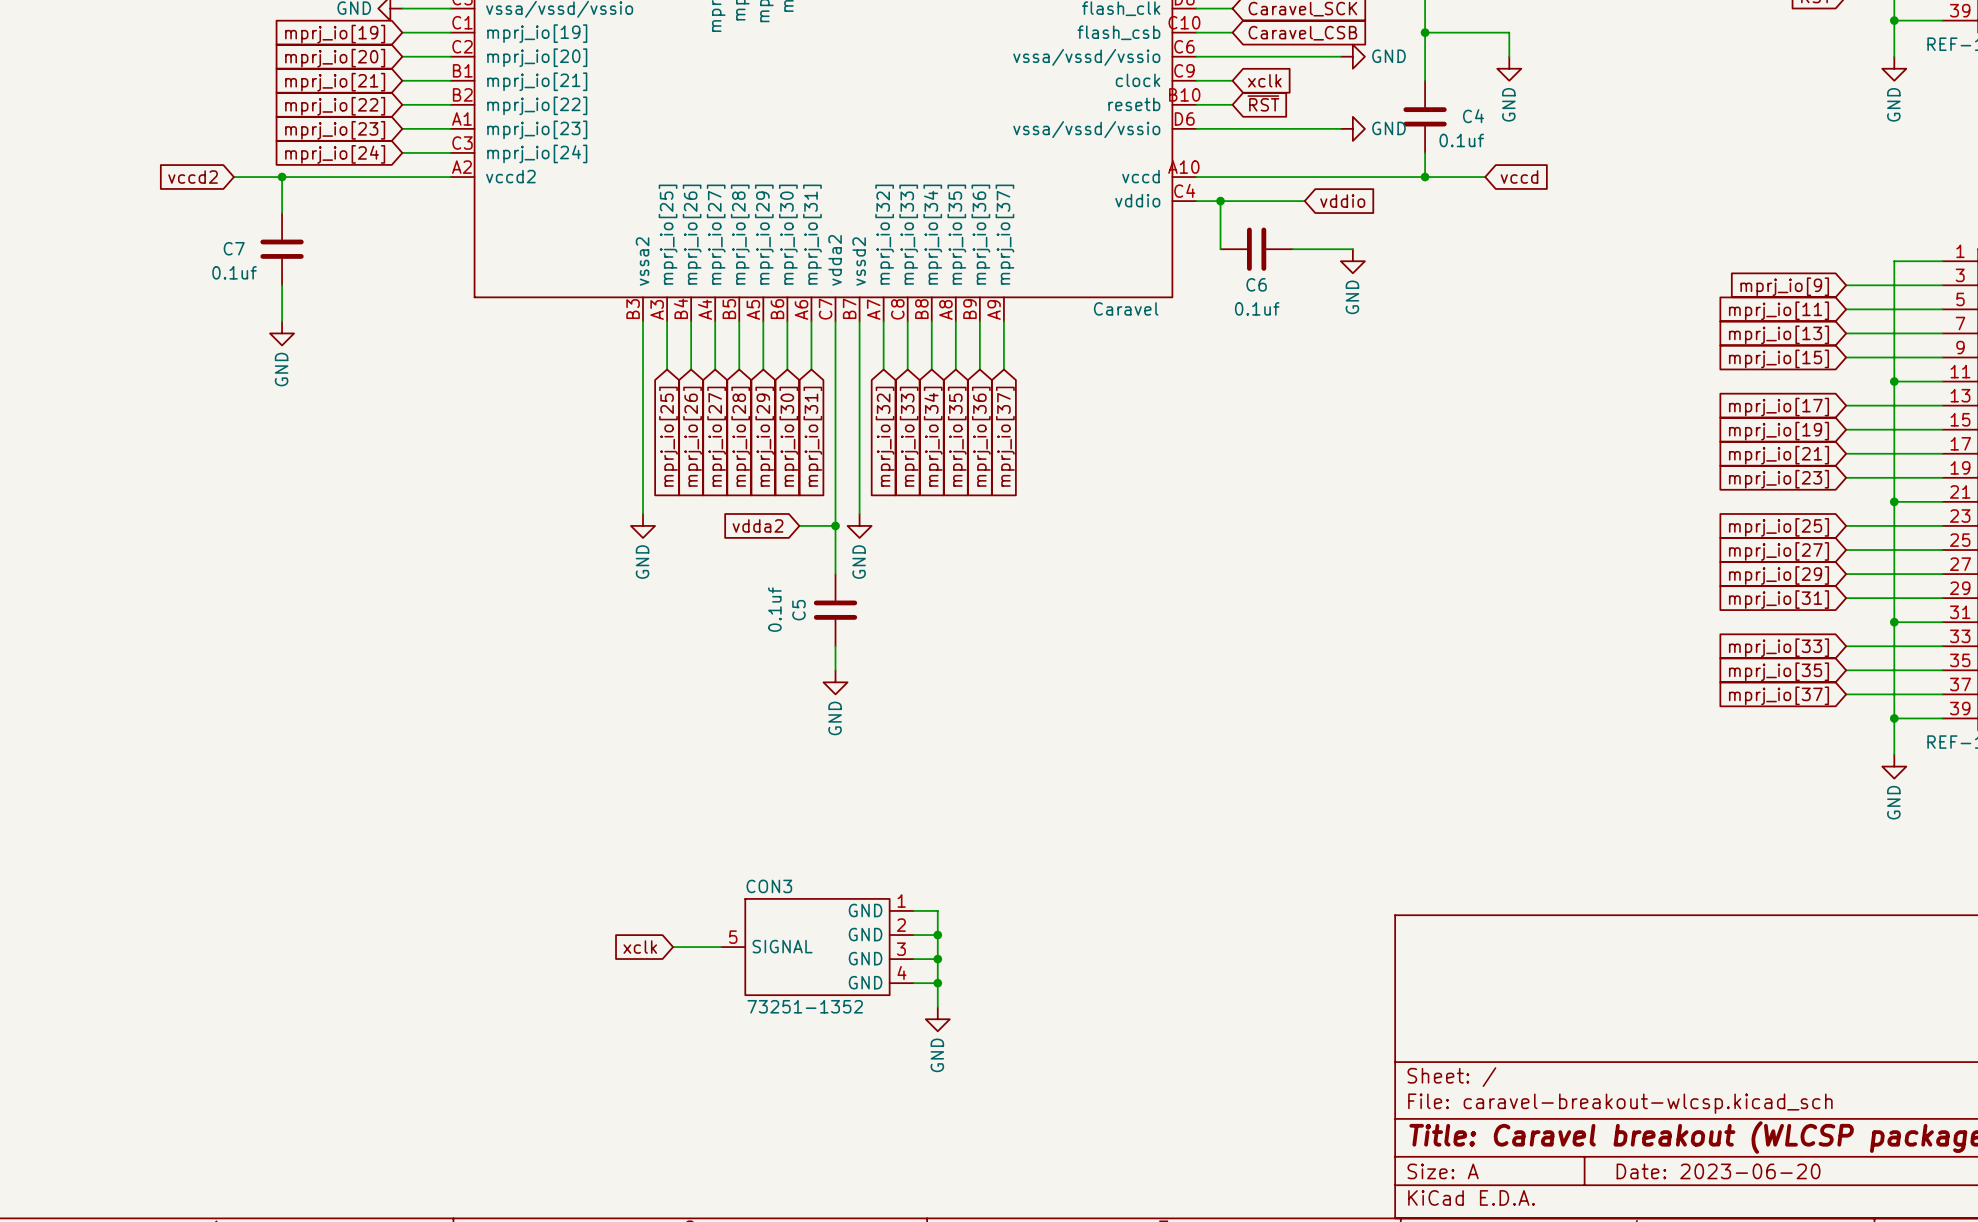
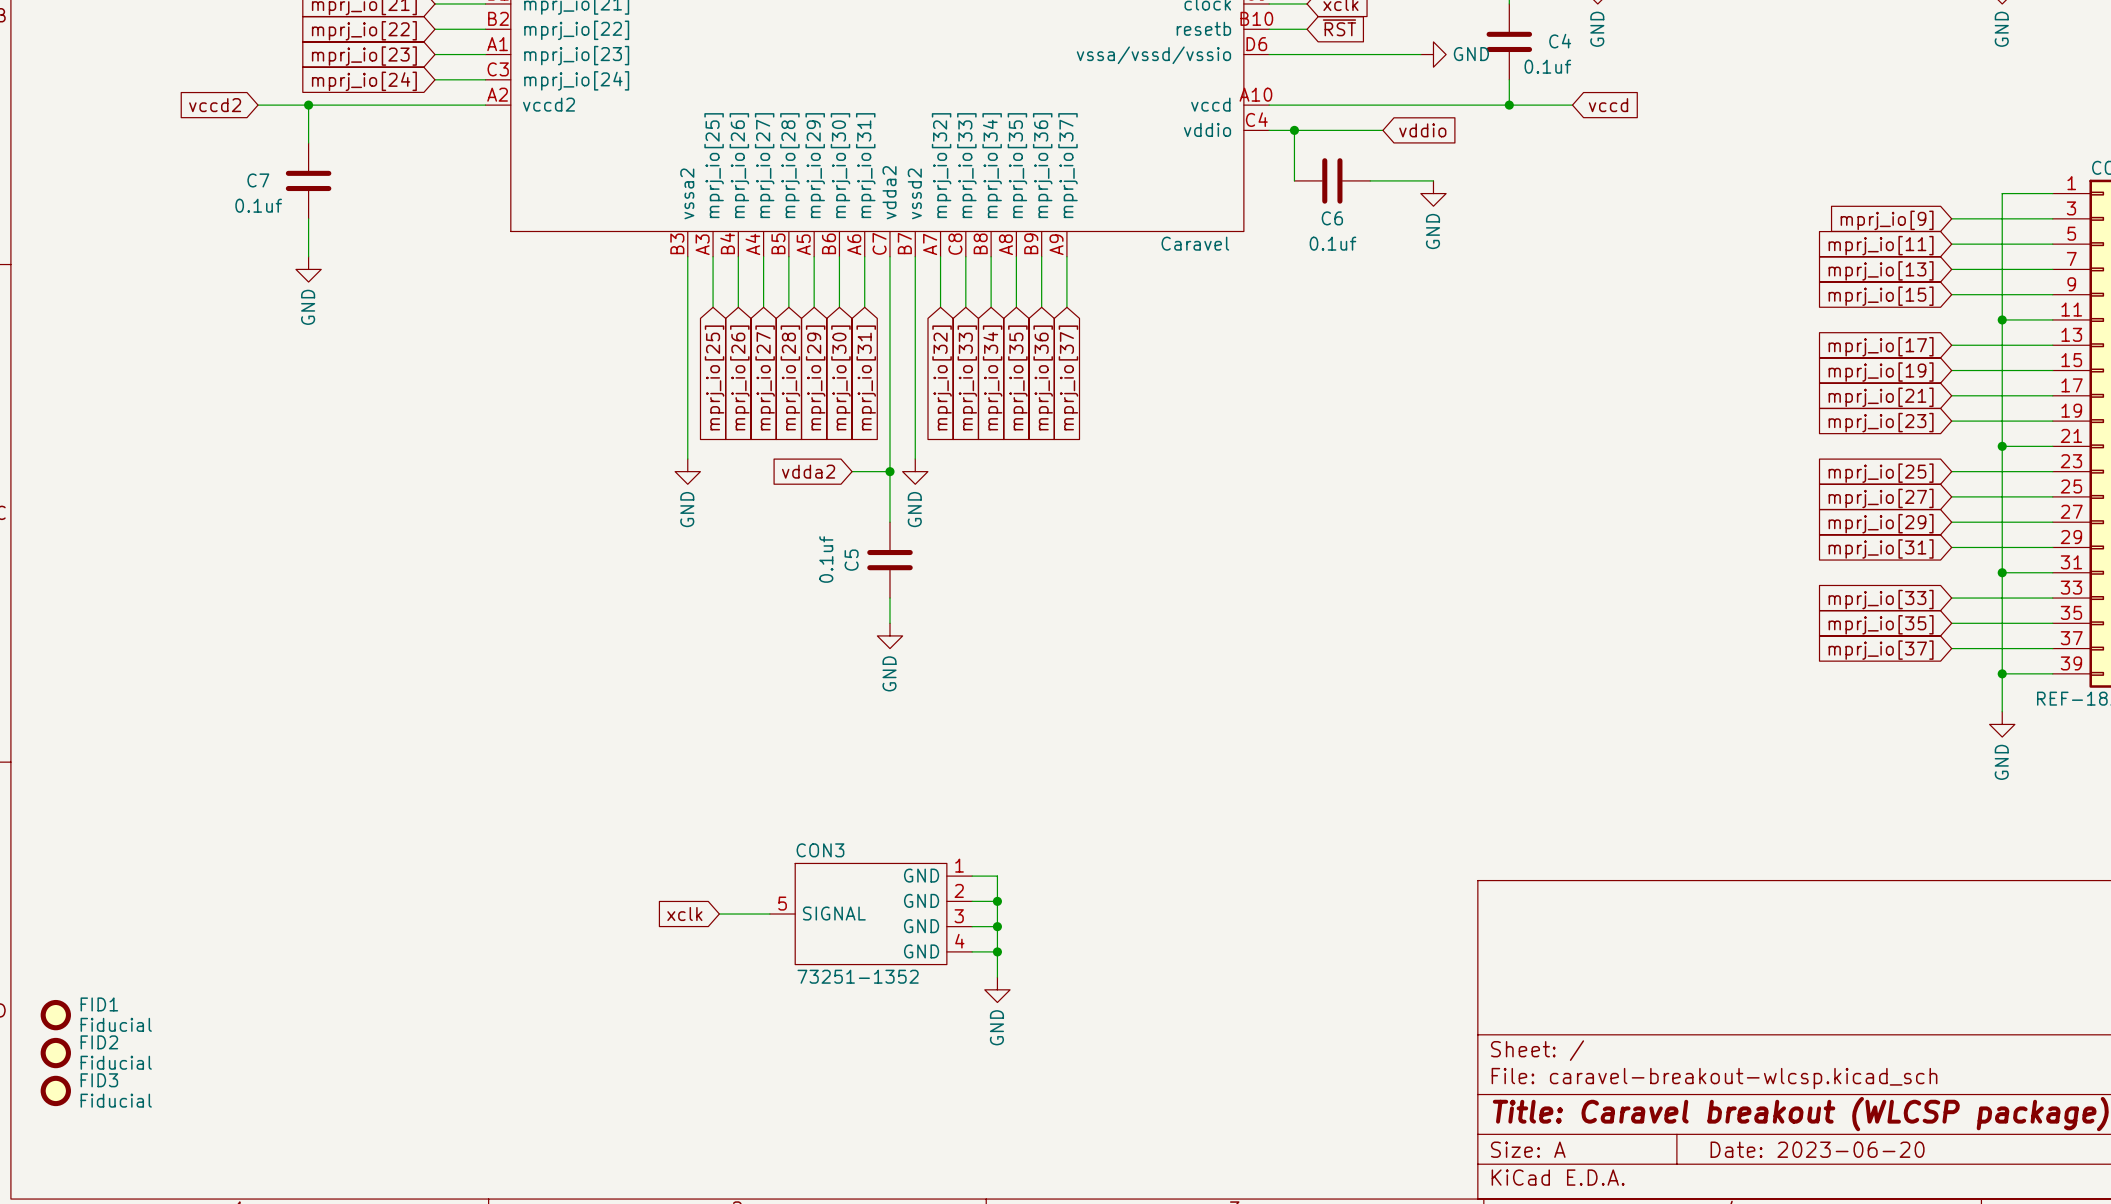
FID1: none -> Fiducial (55, 1015)
FID2: none -> Fiducial (55, 1053)
FID3: none -> Fiducial (55, 1090)

